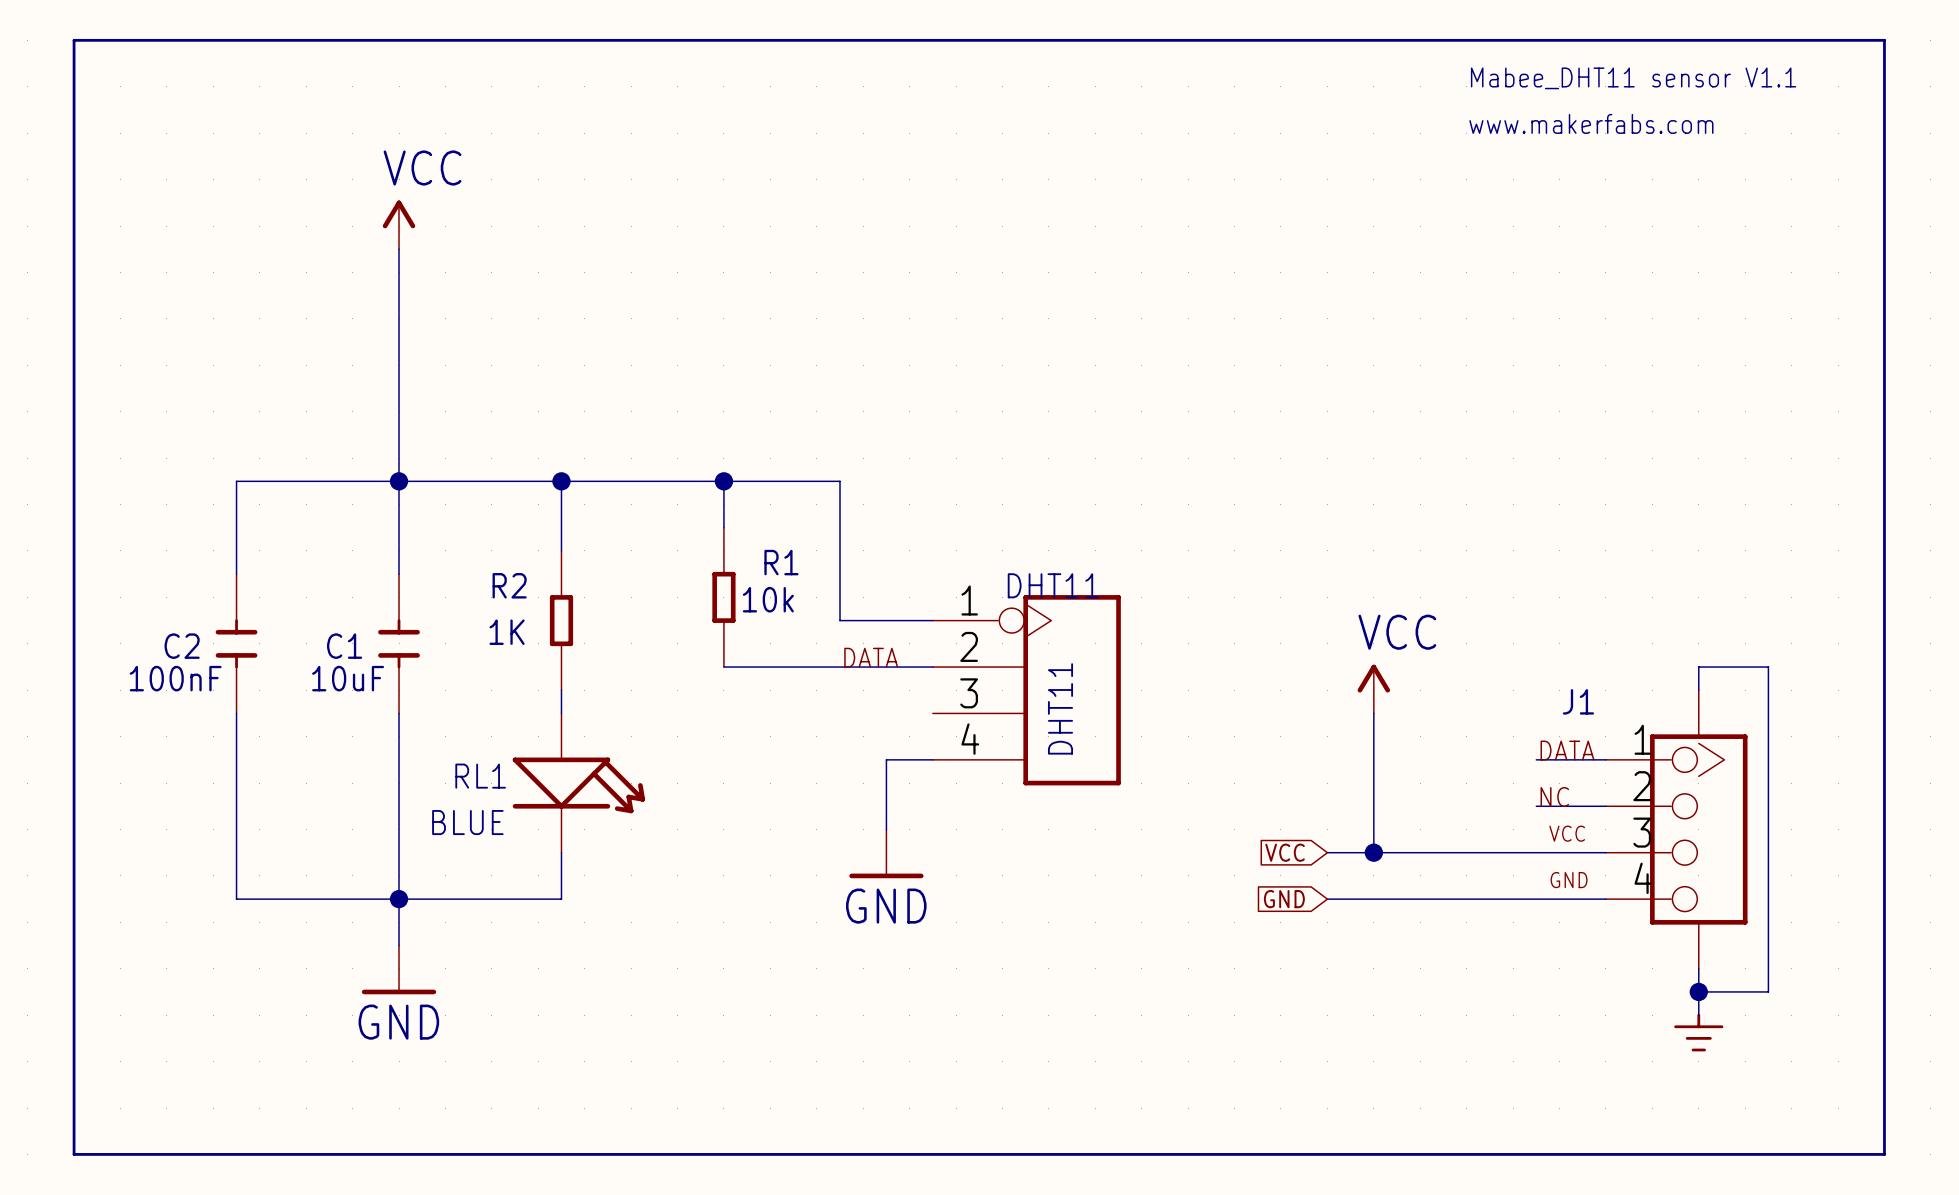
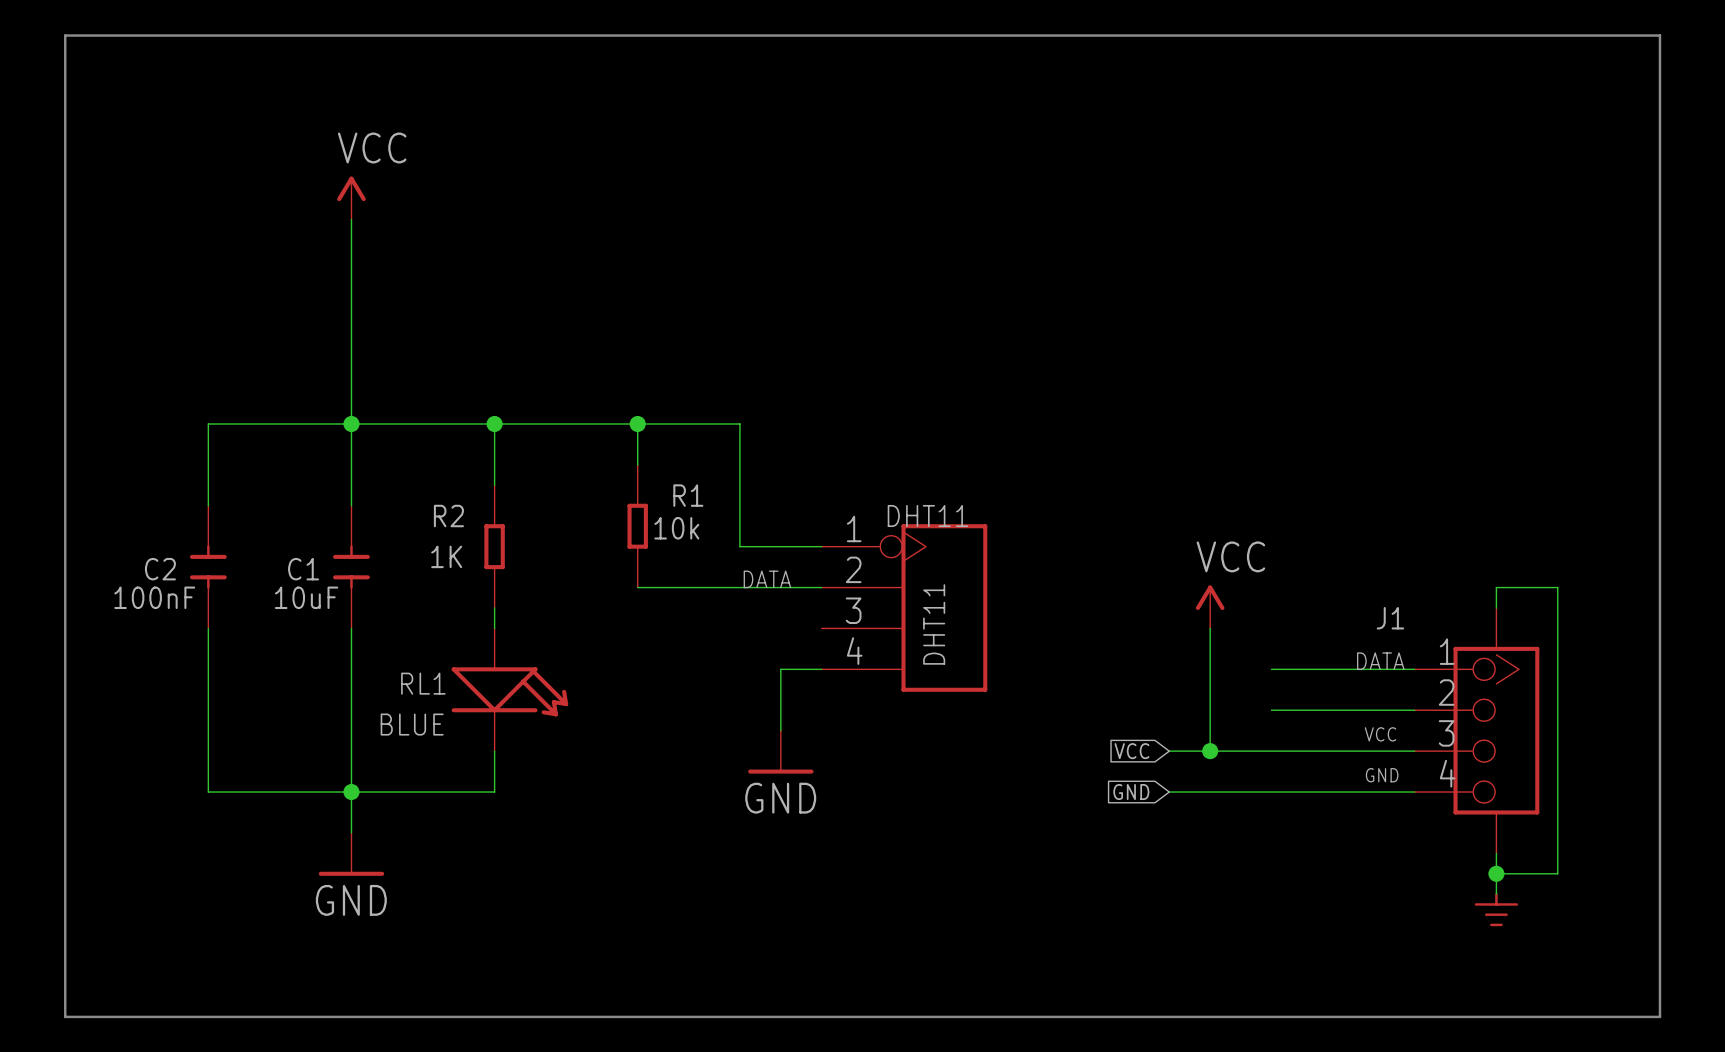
text: Mabee_DHT11 sensor V1.1 (1633, 78) -> none
text: www.makerfabs.com (1591, 123) -> none
wire: none -> (1271, 669) (1353, 669)
label: NC (1554, 796) -> none
wire: none -> (1271, 710) (1353, 710)

